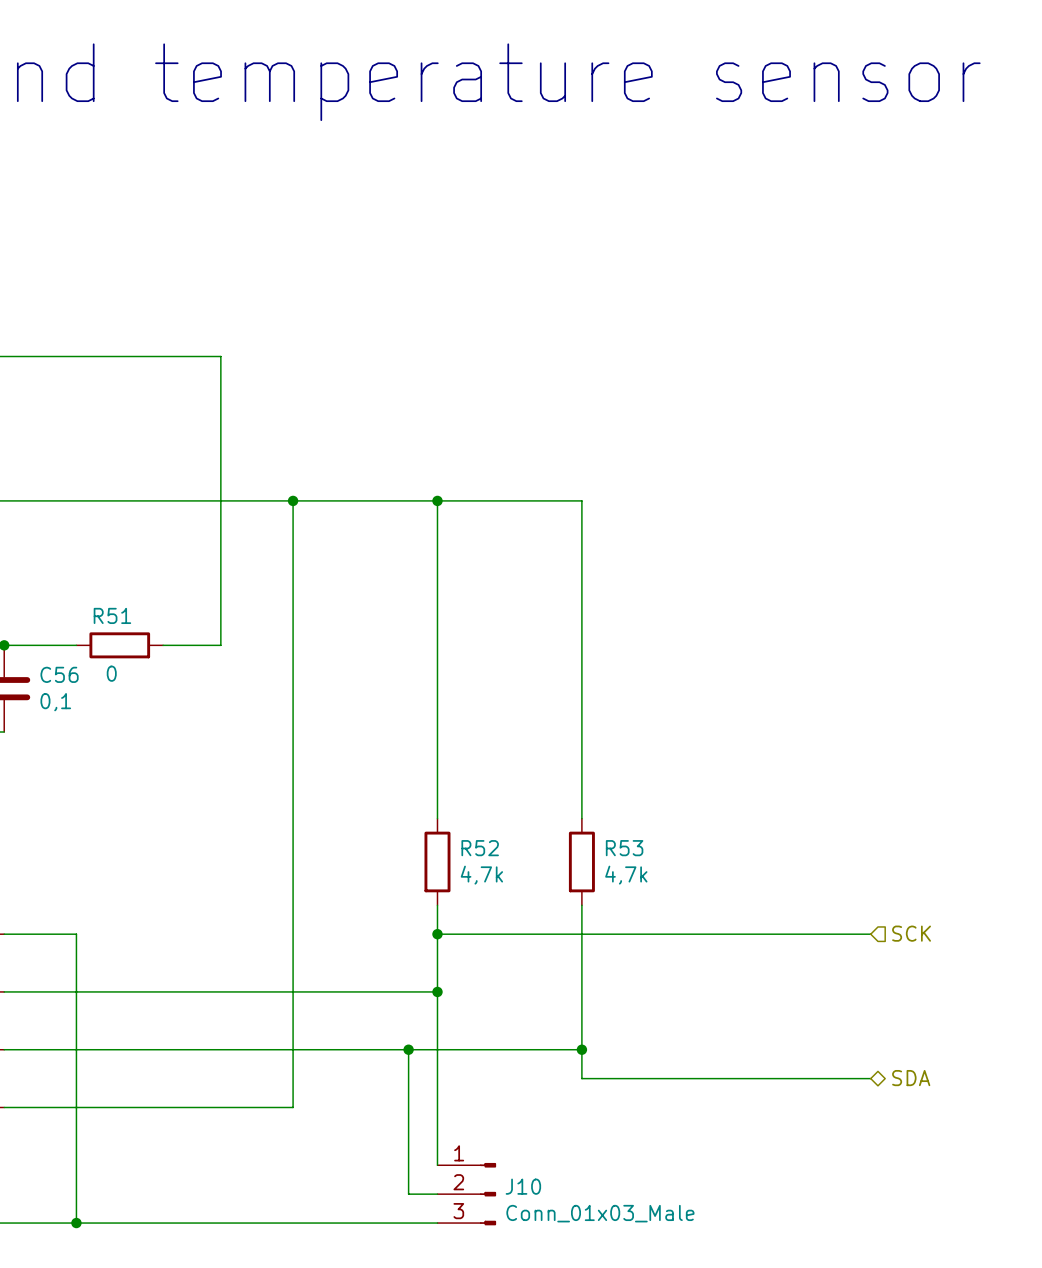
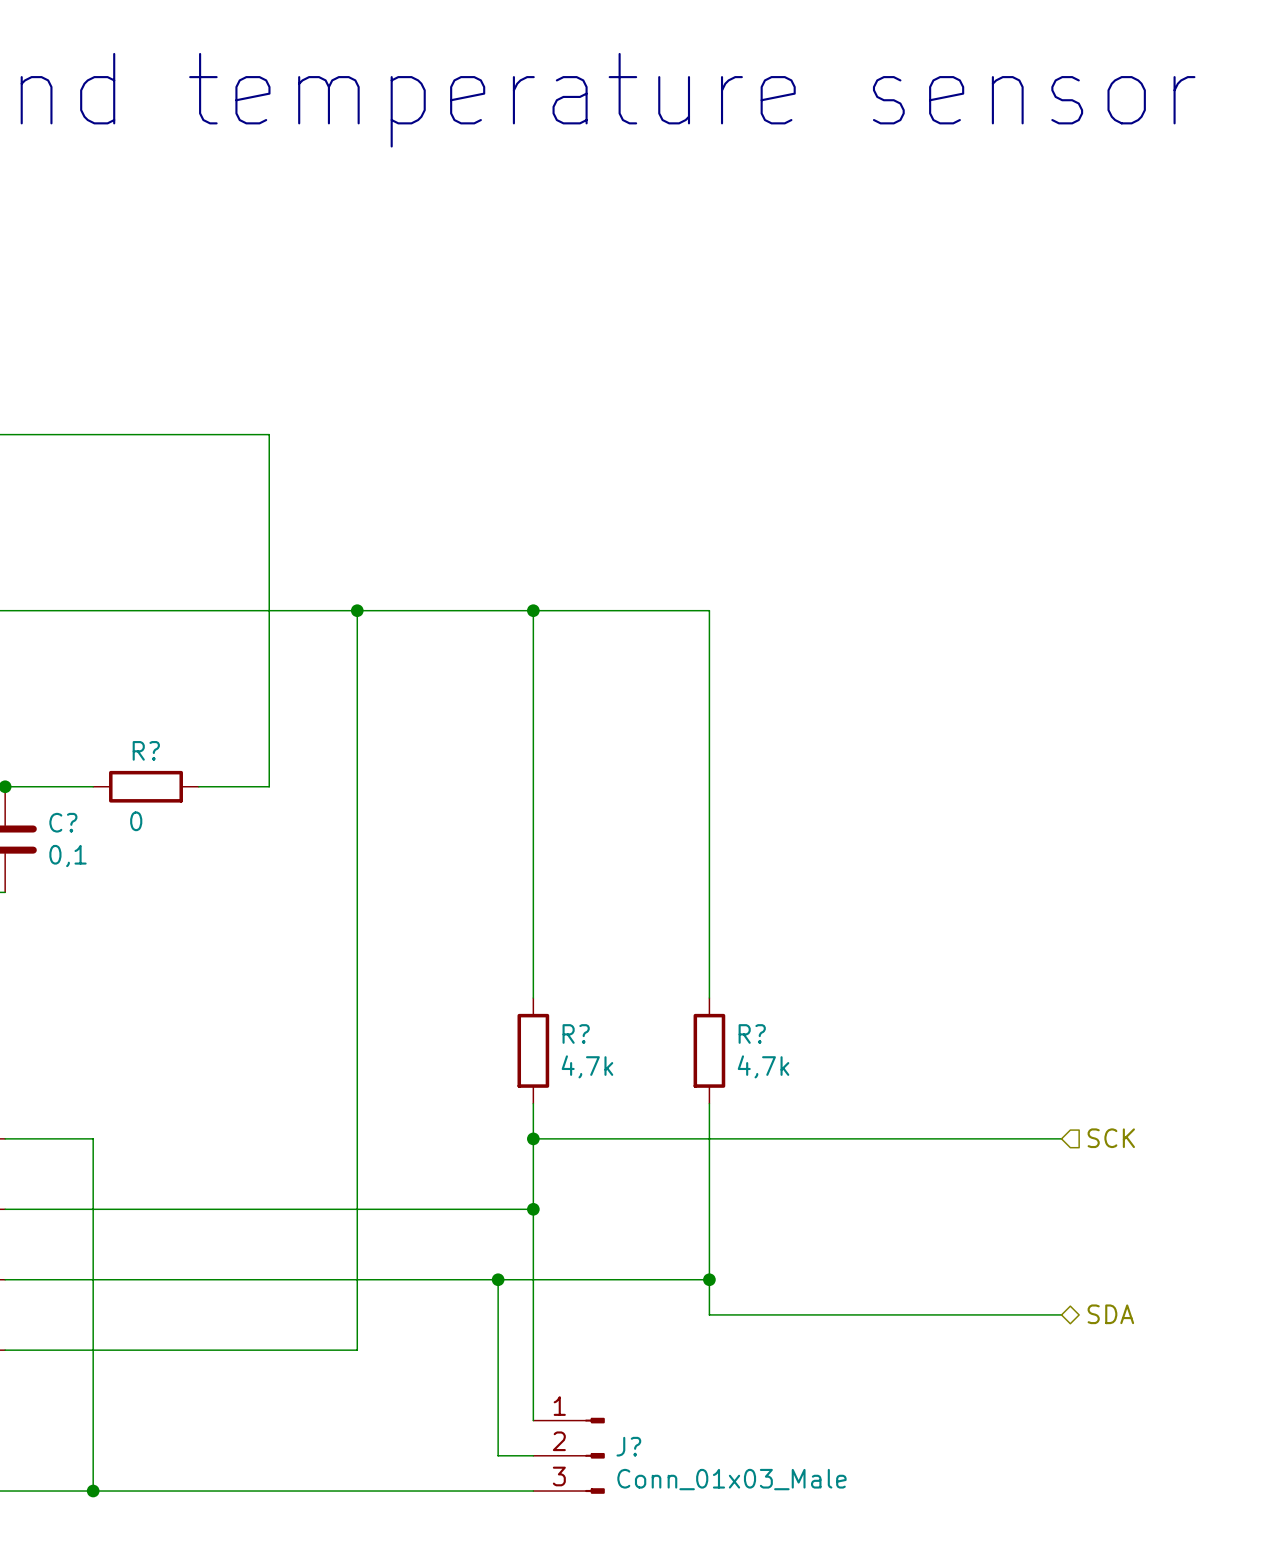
R51 name: R51 (112, 615) -> R? (146, 750)
C56 name: C56 (59, 674) -> C? (63, 822)
R52 name: R52 (480, 848) -> R? (576, 1033)
R53 name: R53 (624, 848) -> R? (752, 1033)
J10 name: J10 (523, 1186) -> J? (628, 1446)

